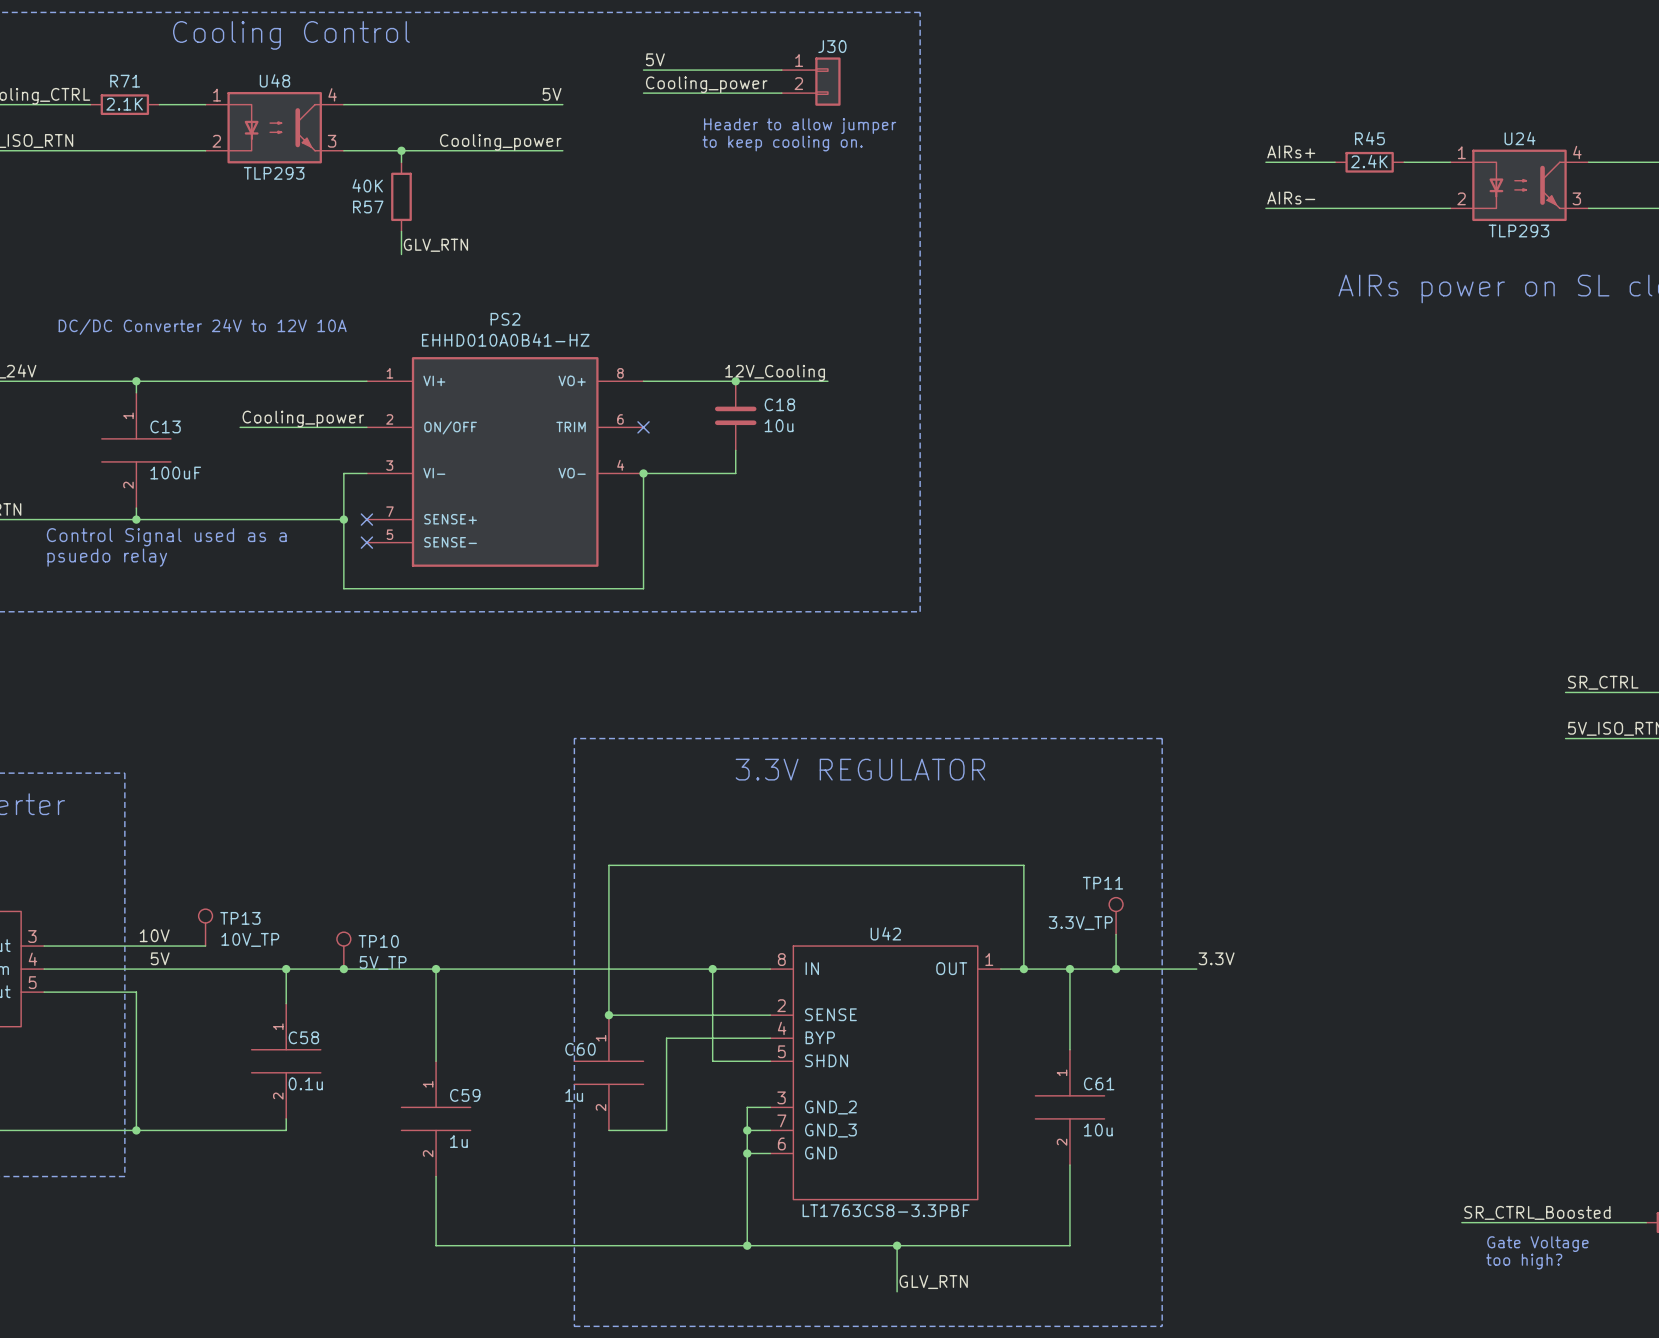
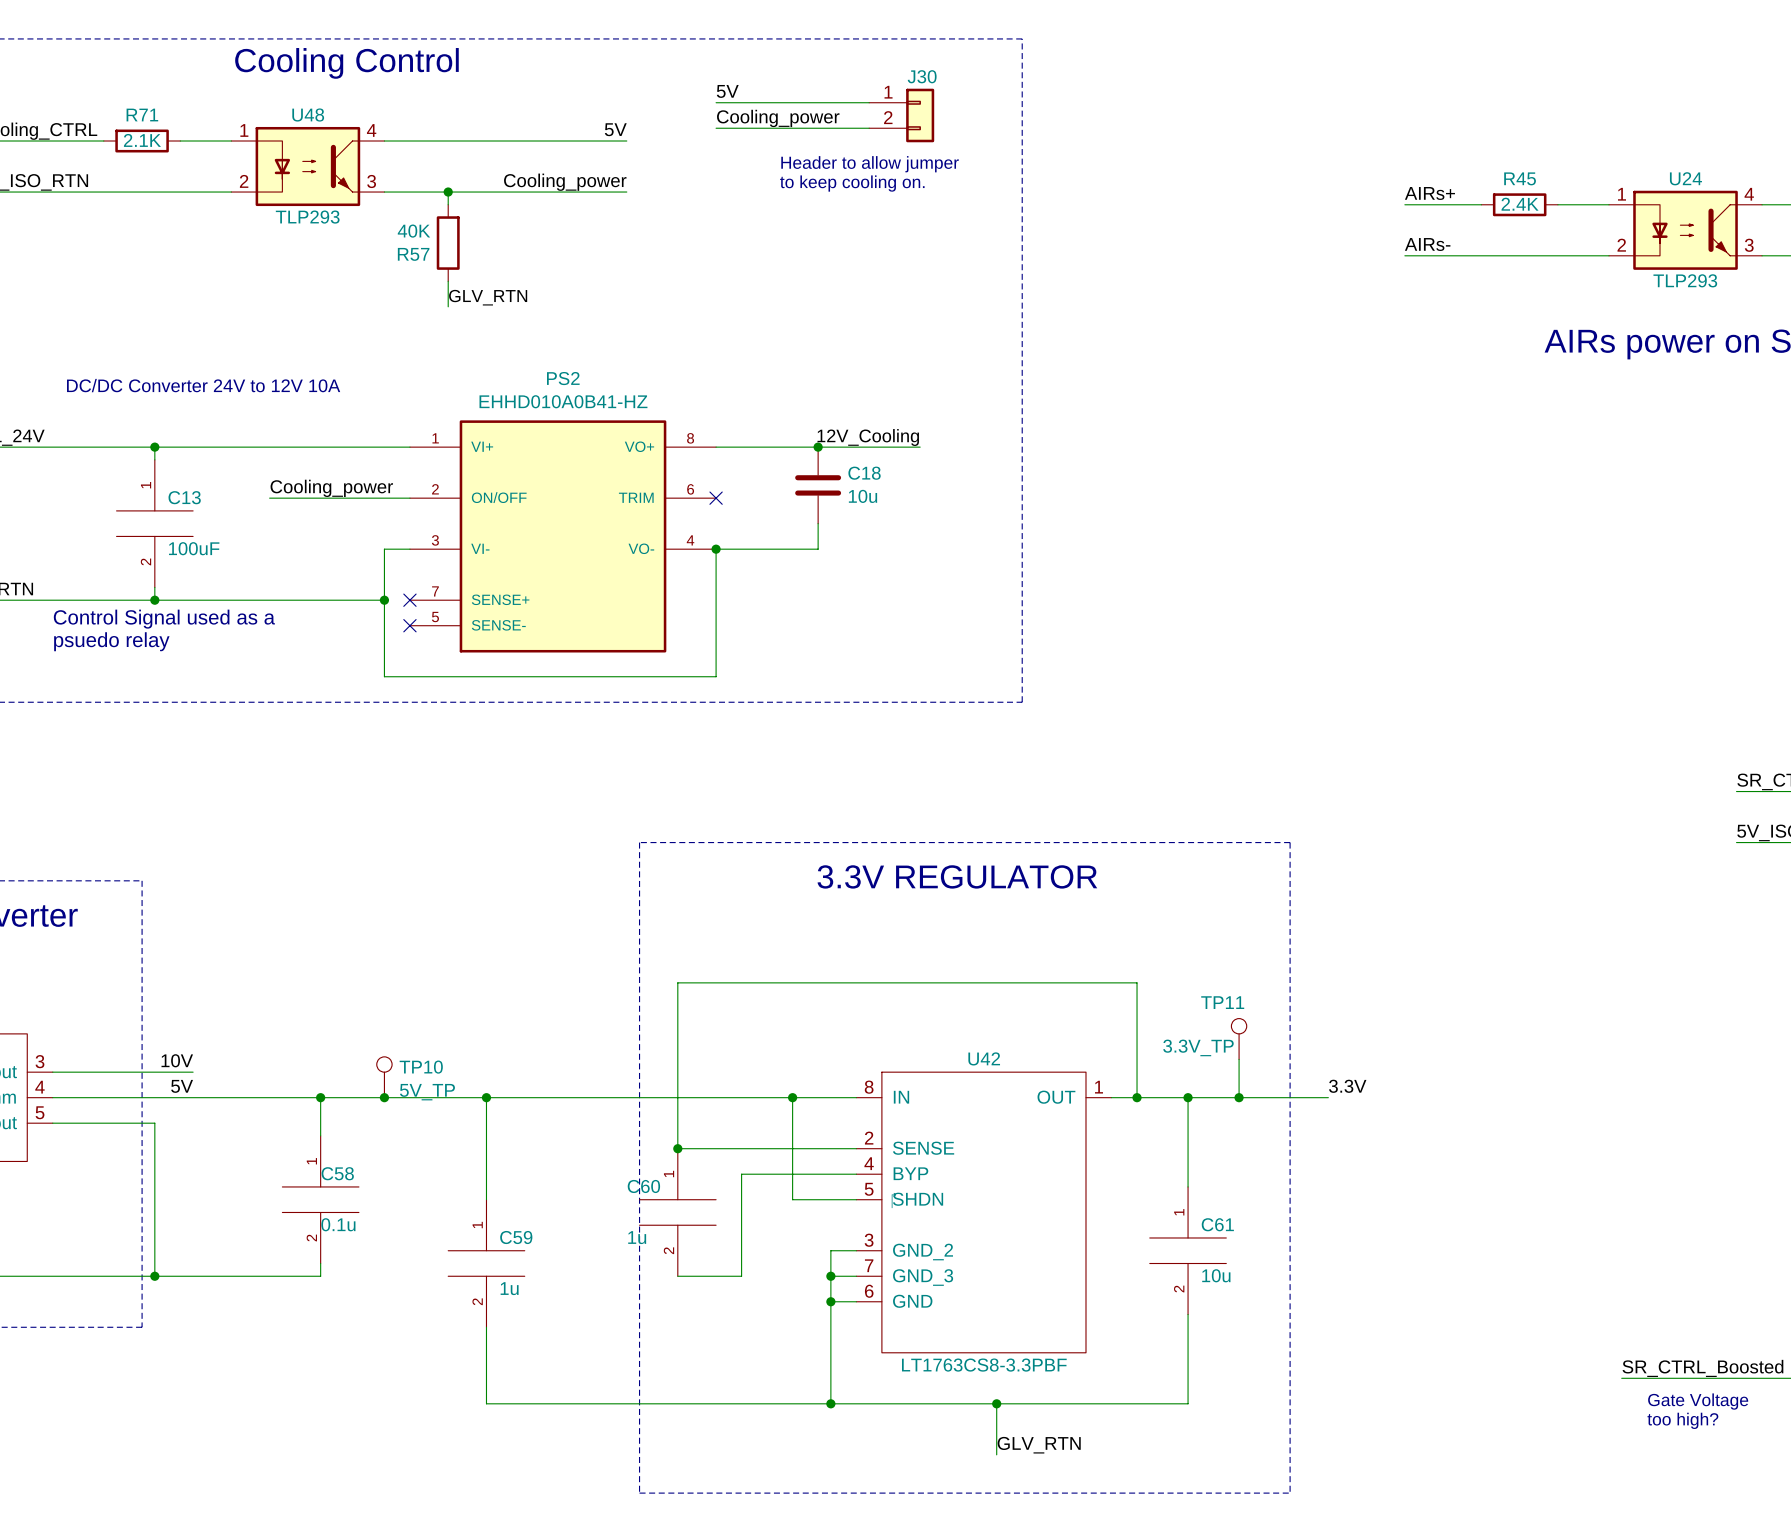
TP13: 10V_TP (205, 927) -> none
wire: (170, 946) (205, 946) -> none

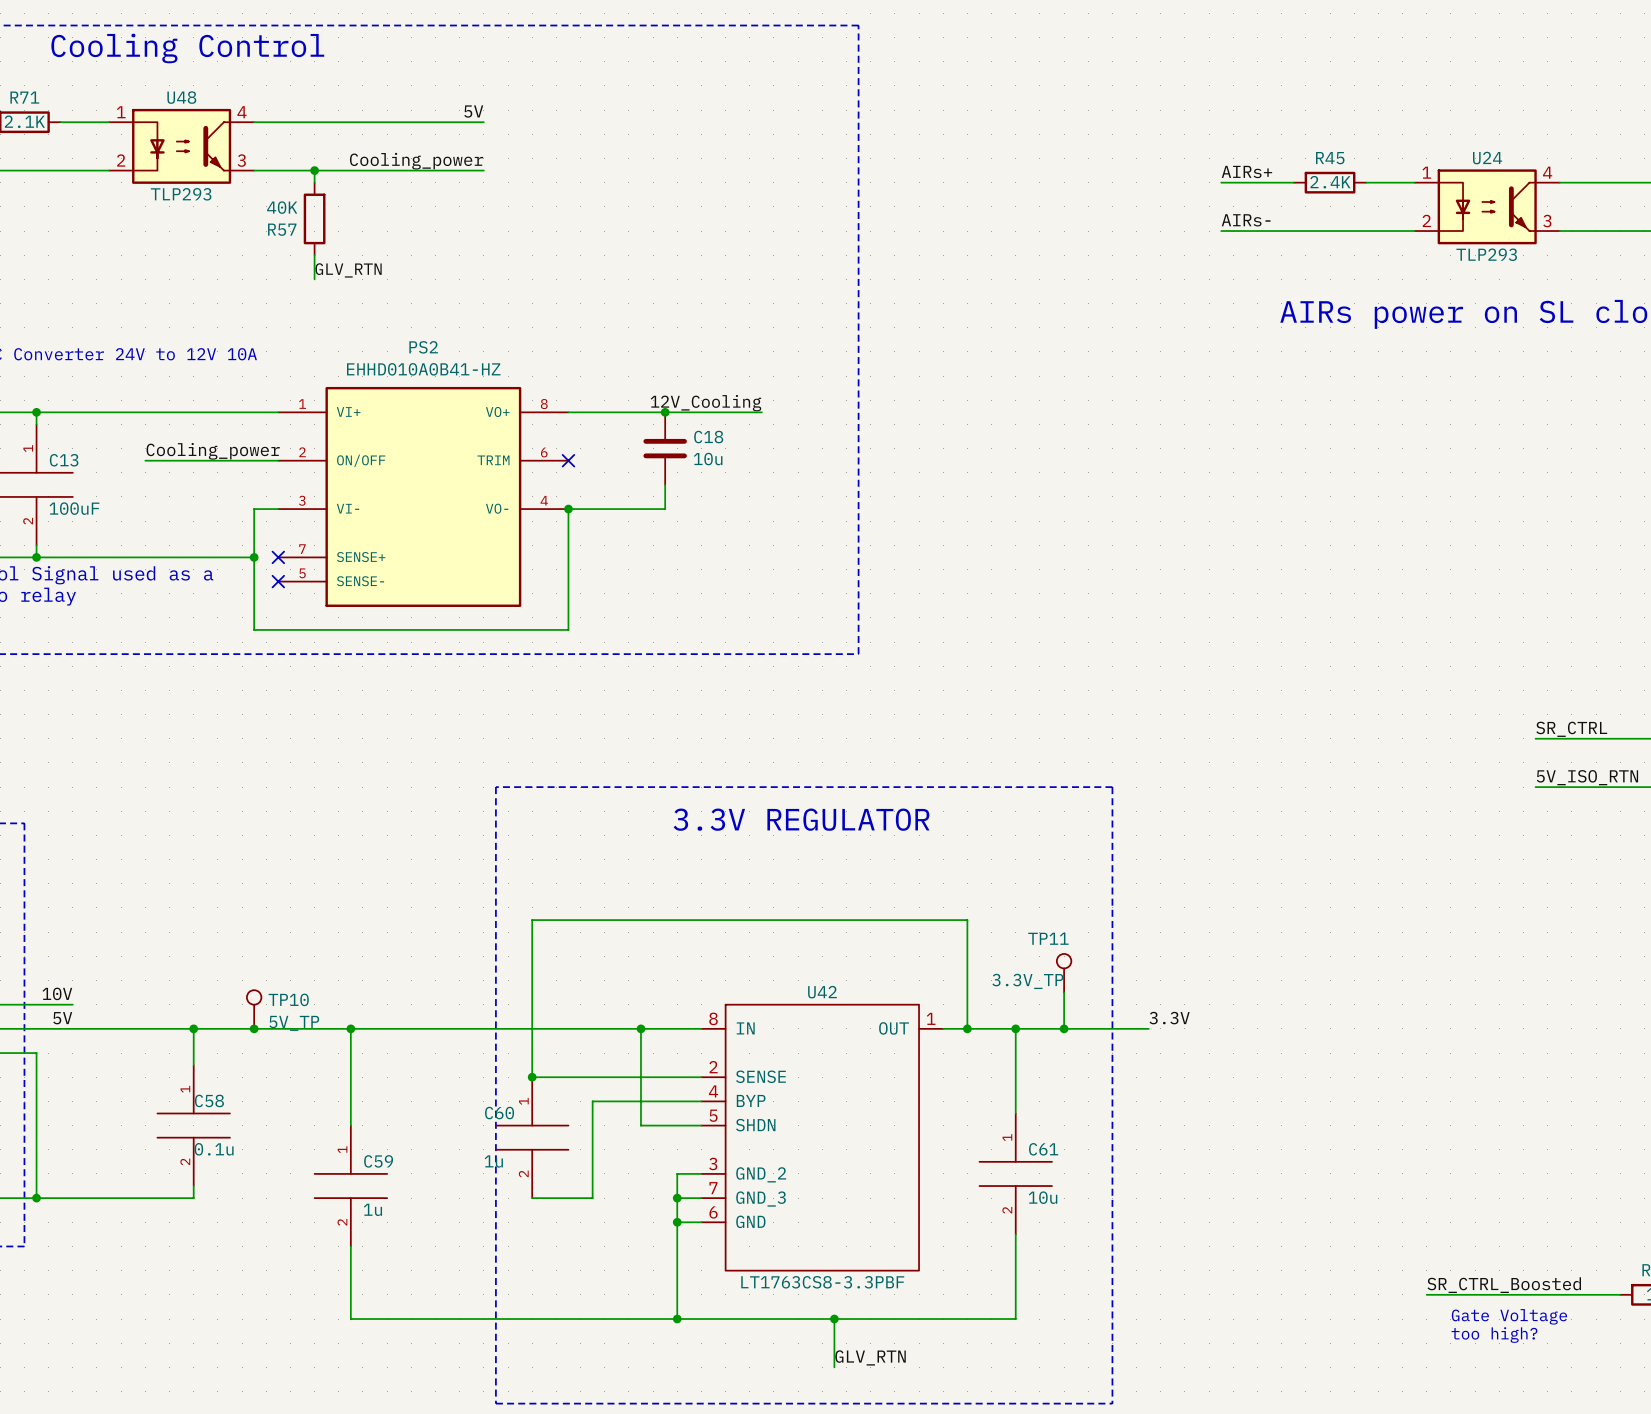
label: 5V (727, 91) -> none
wire: (716, 102) (869, 102) -> none
J30: (901, 115) -> none
label: Cooling_power (778, 118) -> none
wire: (716, 128) (869, 128) -> none
text: Header to allow jumper (870, 164) -> none
text: to keep cooling on. (852, 183) -> none

